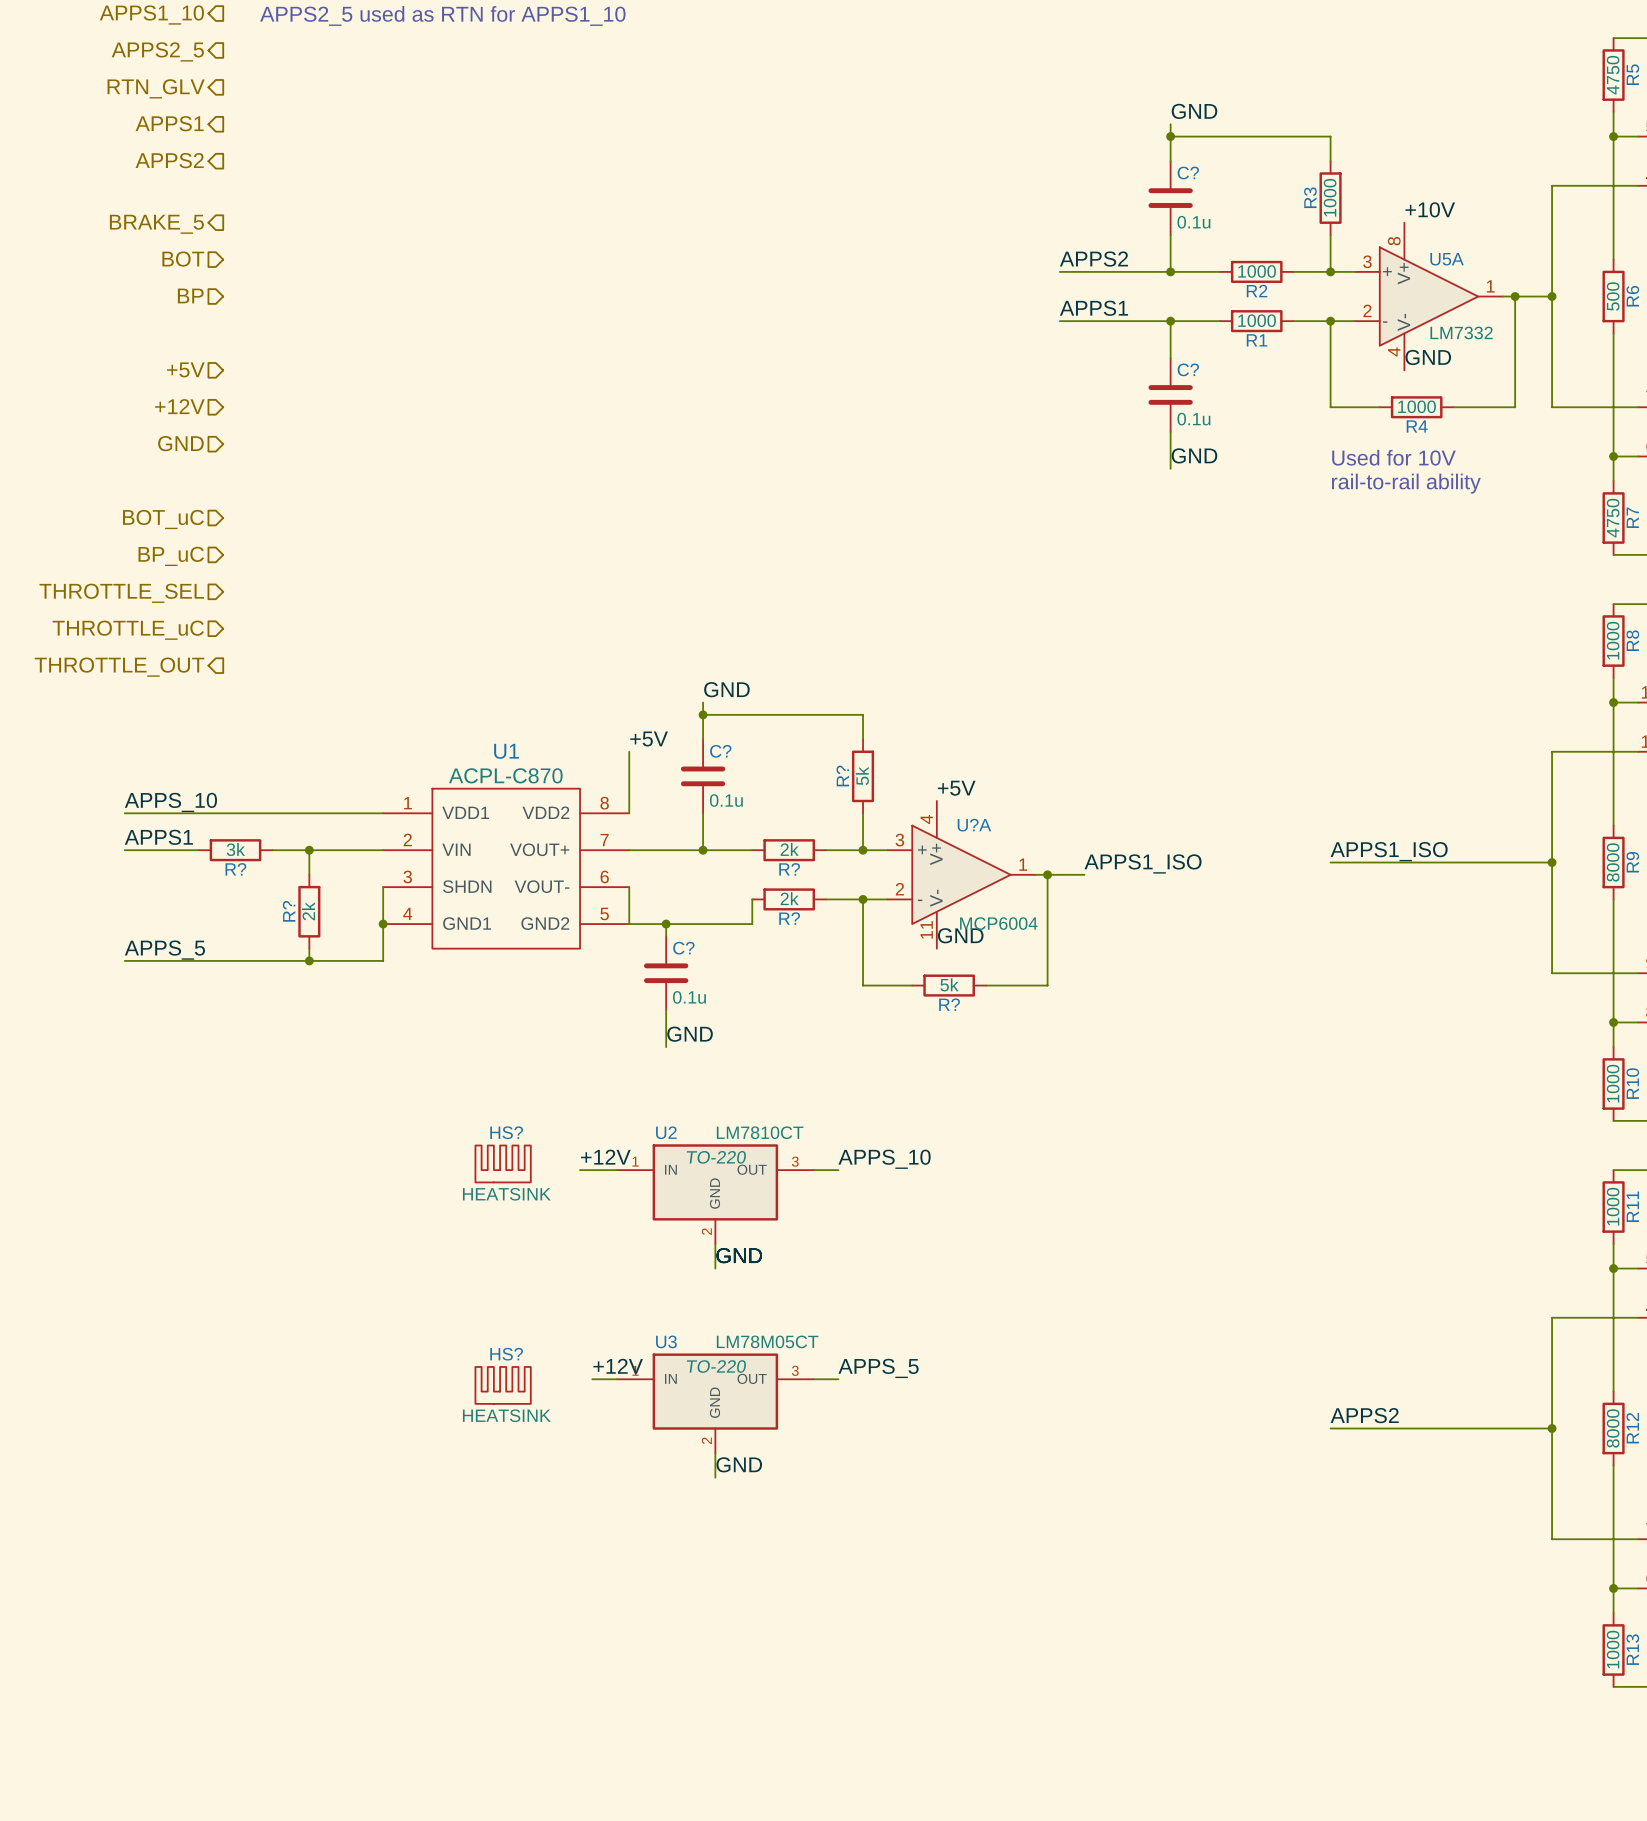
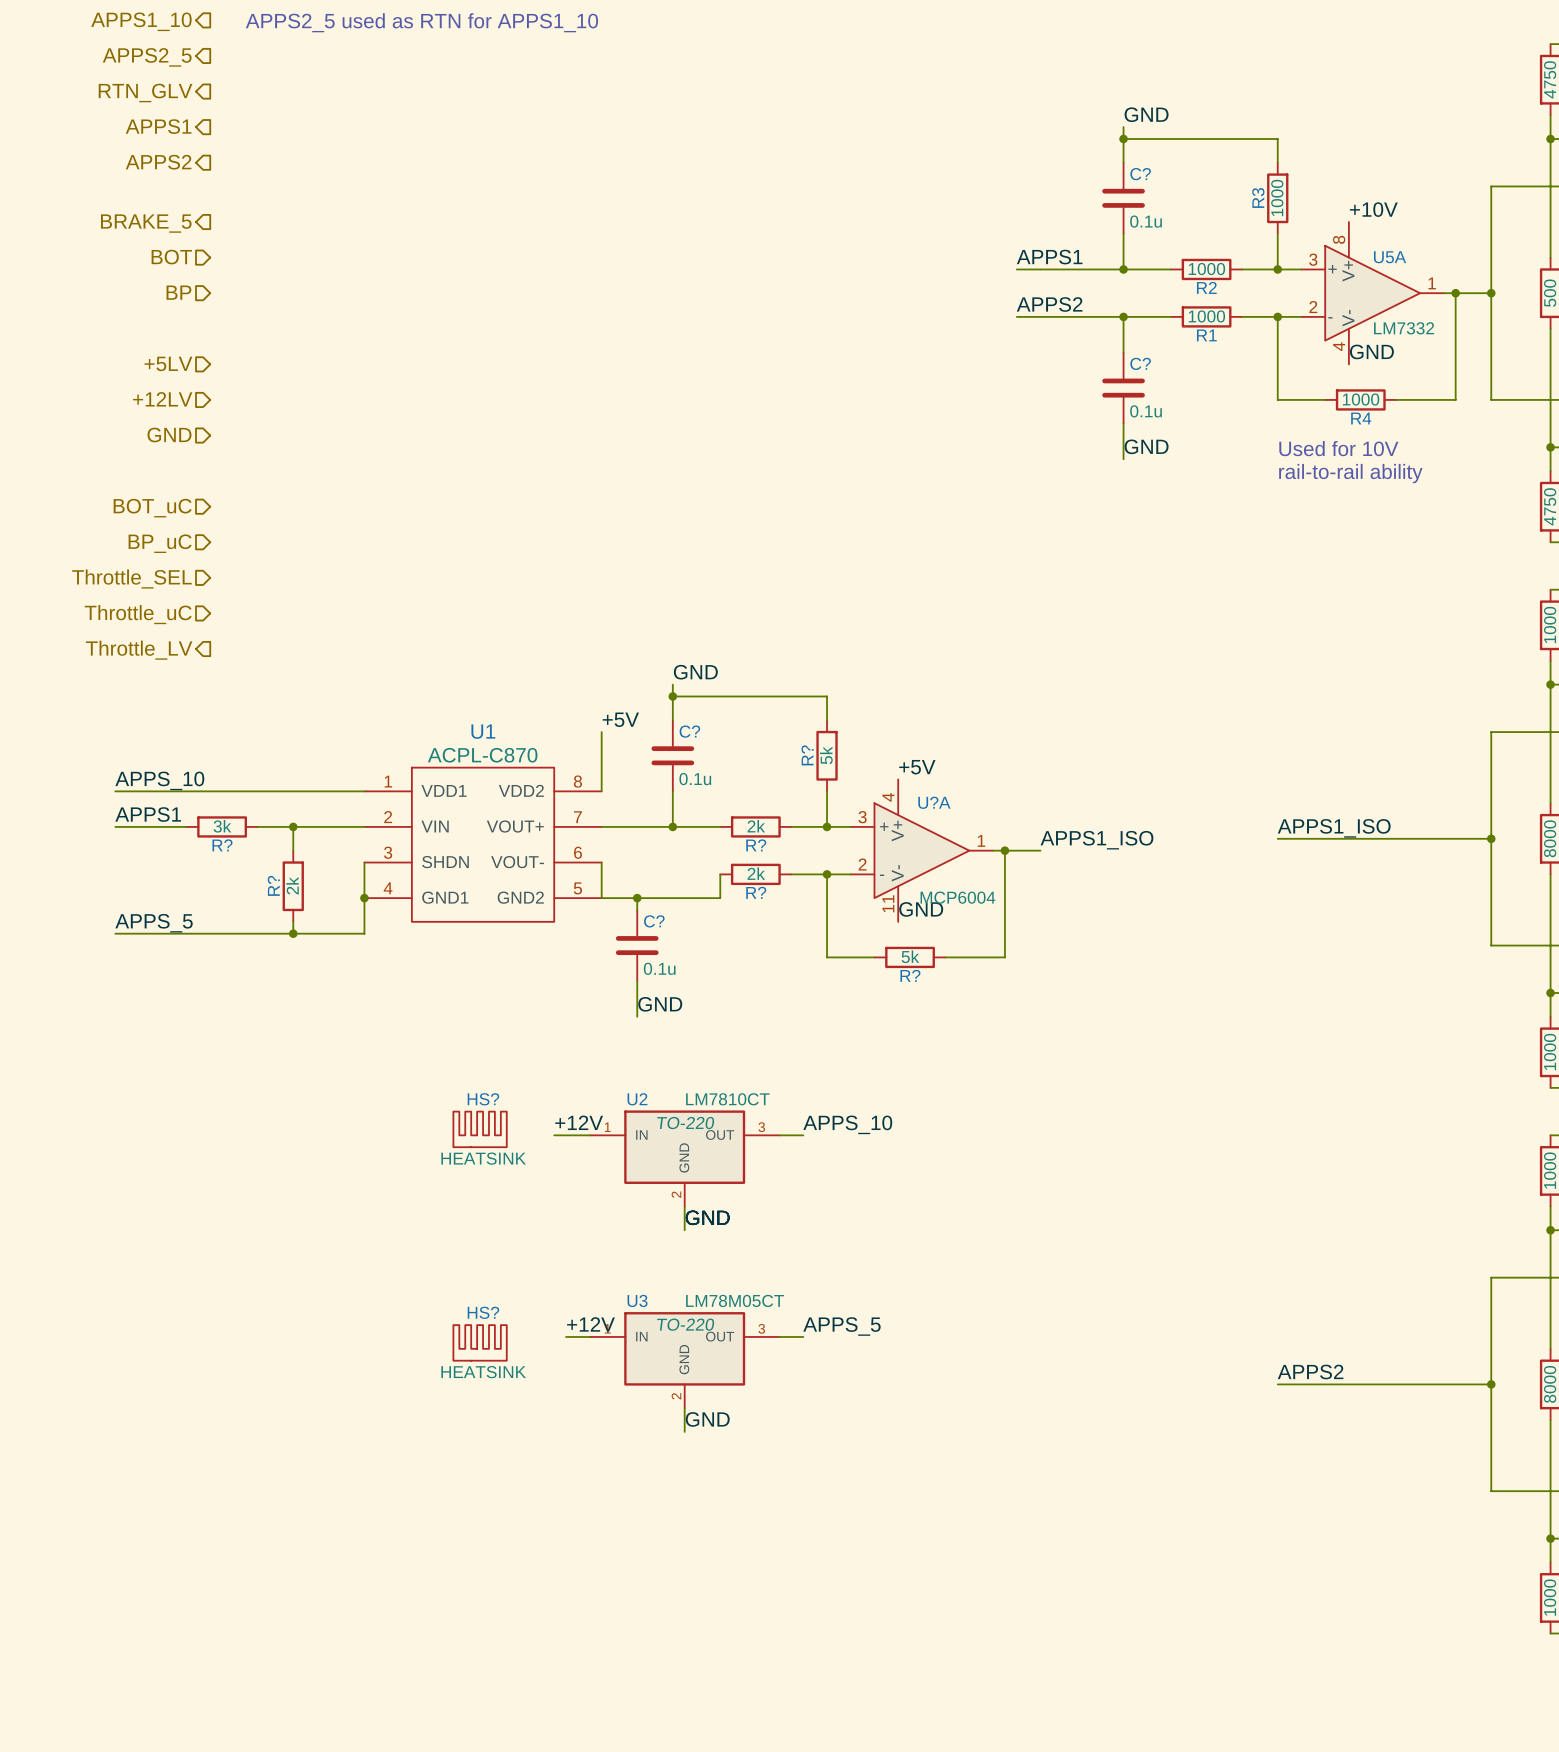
label: APPS2 (1093, 259) -> APPS1 (1049, 257)
label: APPS1 (1093, 308) -> APPS2 (1049, 304)
hierarchical label: +5V (185, 369) -> +5LV (168, 363)
hierarchical label: +12V (179, 406) -> +12LV (162, 399)
hierarchical label: THROTTLE_SEL (121, 593) -> Throttle_SEL (131, 579)
hierarchical label: THROTTLE_uC (128, 630) -> Throttle_uC (138, 614)
hierarchical label: THROTTLE_OUT (119, 667) -> Throttle_LV (139, 650)

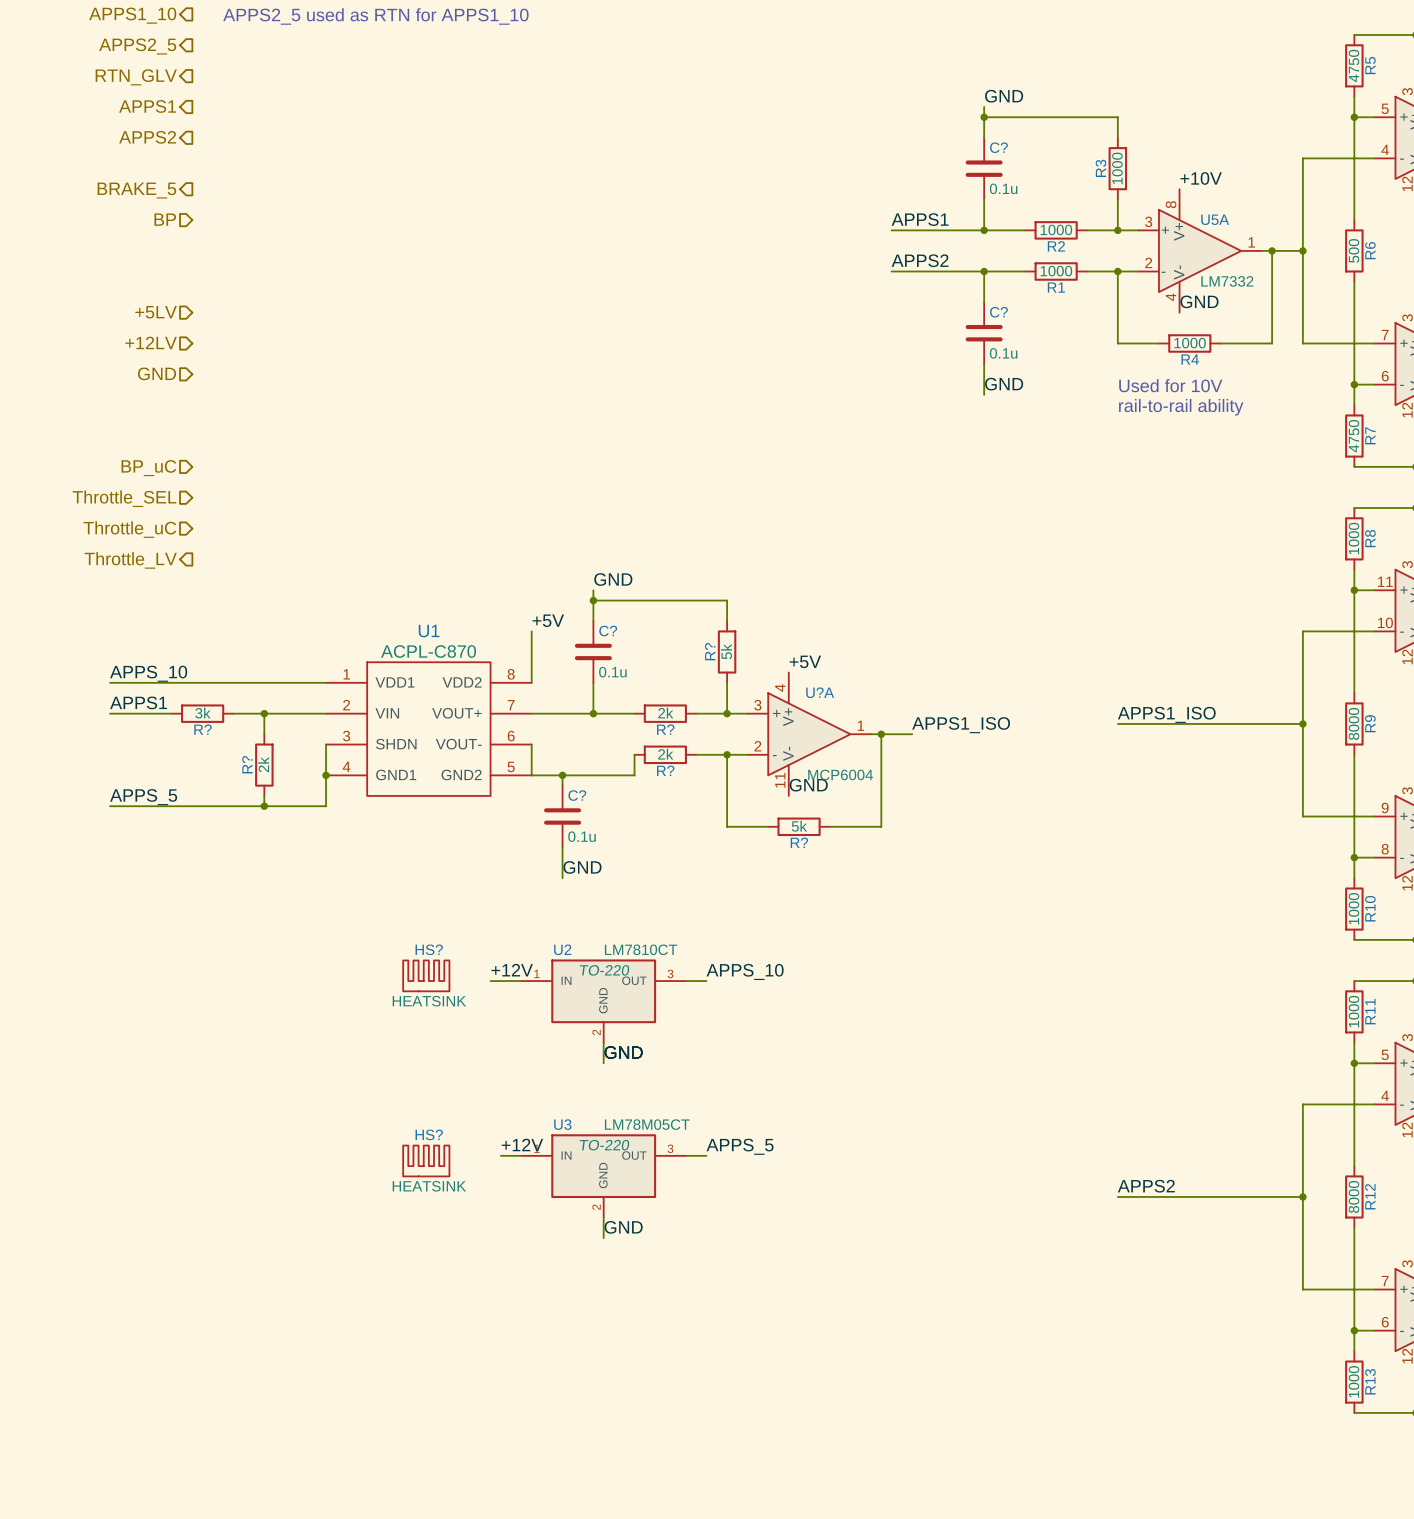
hierarchical label: BOT (171, 257) -> BP (165, 219)
hierarchical label: BP (178, 292) -> none
hierarchical label: BOT_uC (152, 508) -> none

